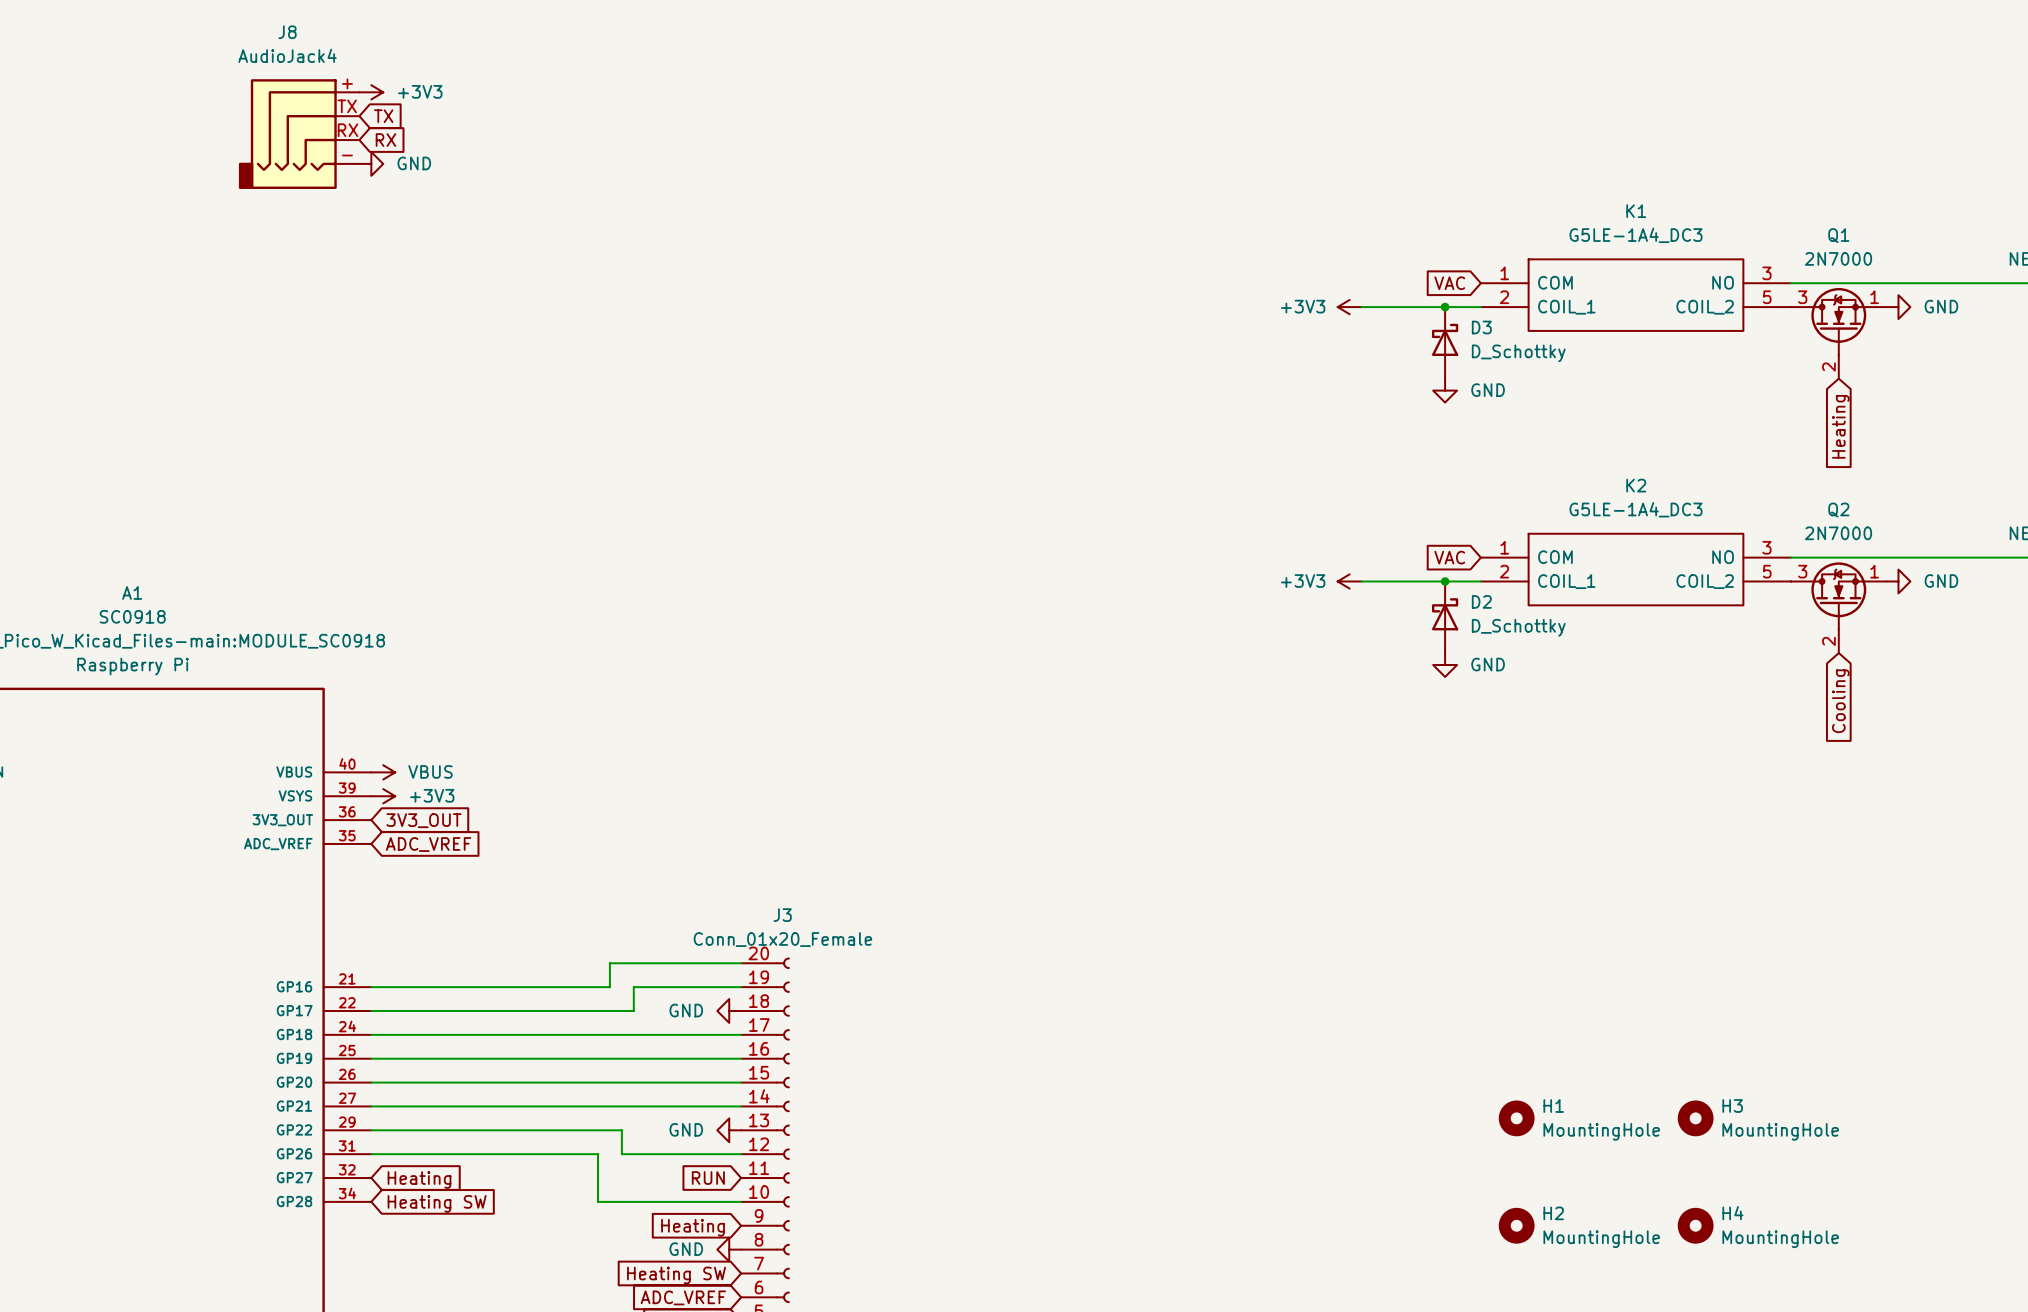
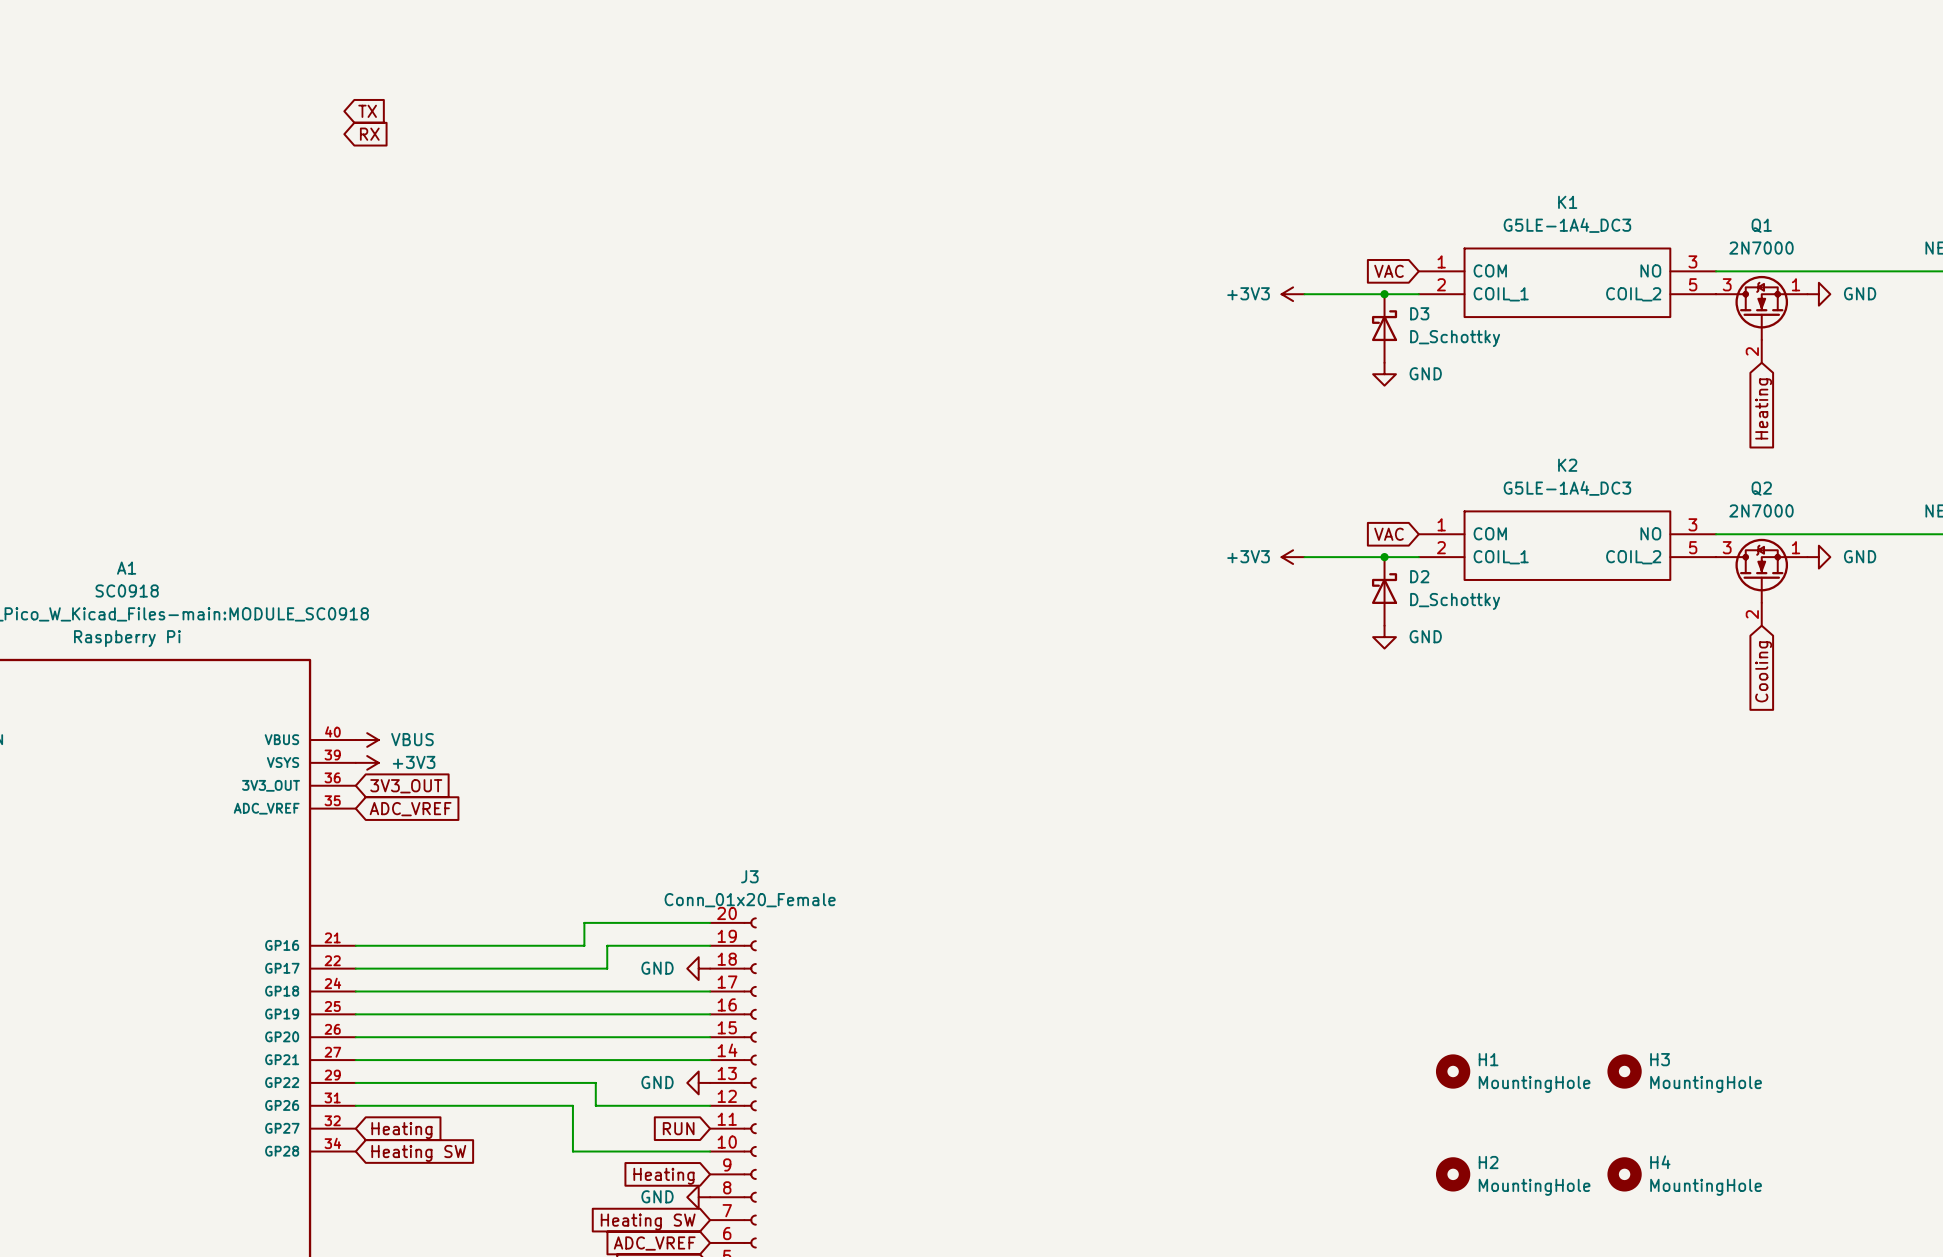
power symbol: +3V3 (371, 92) -> none
J8: AudioJack4 (299, 134) -> none
power symbol: GND (371, 163) -> none

